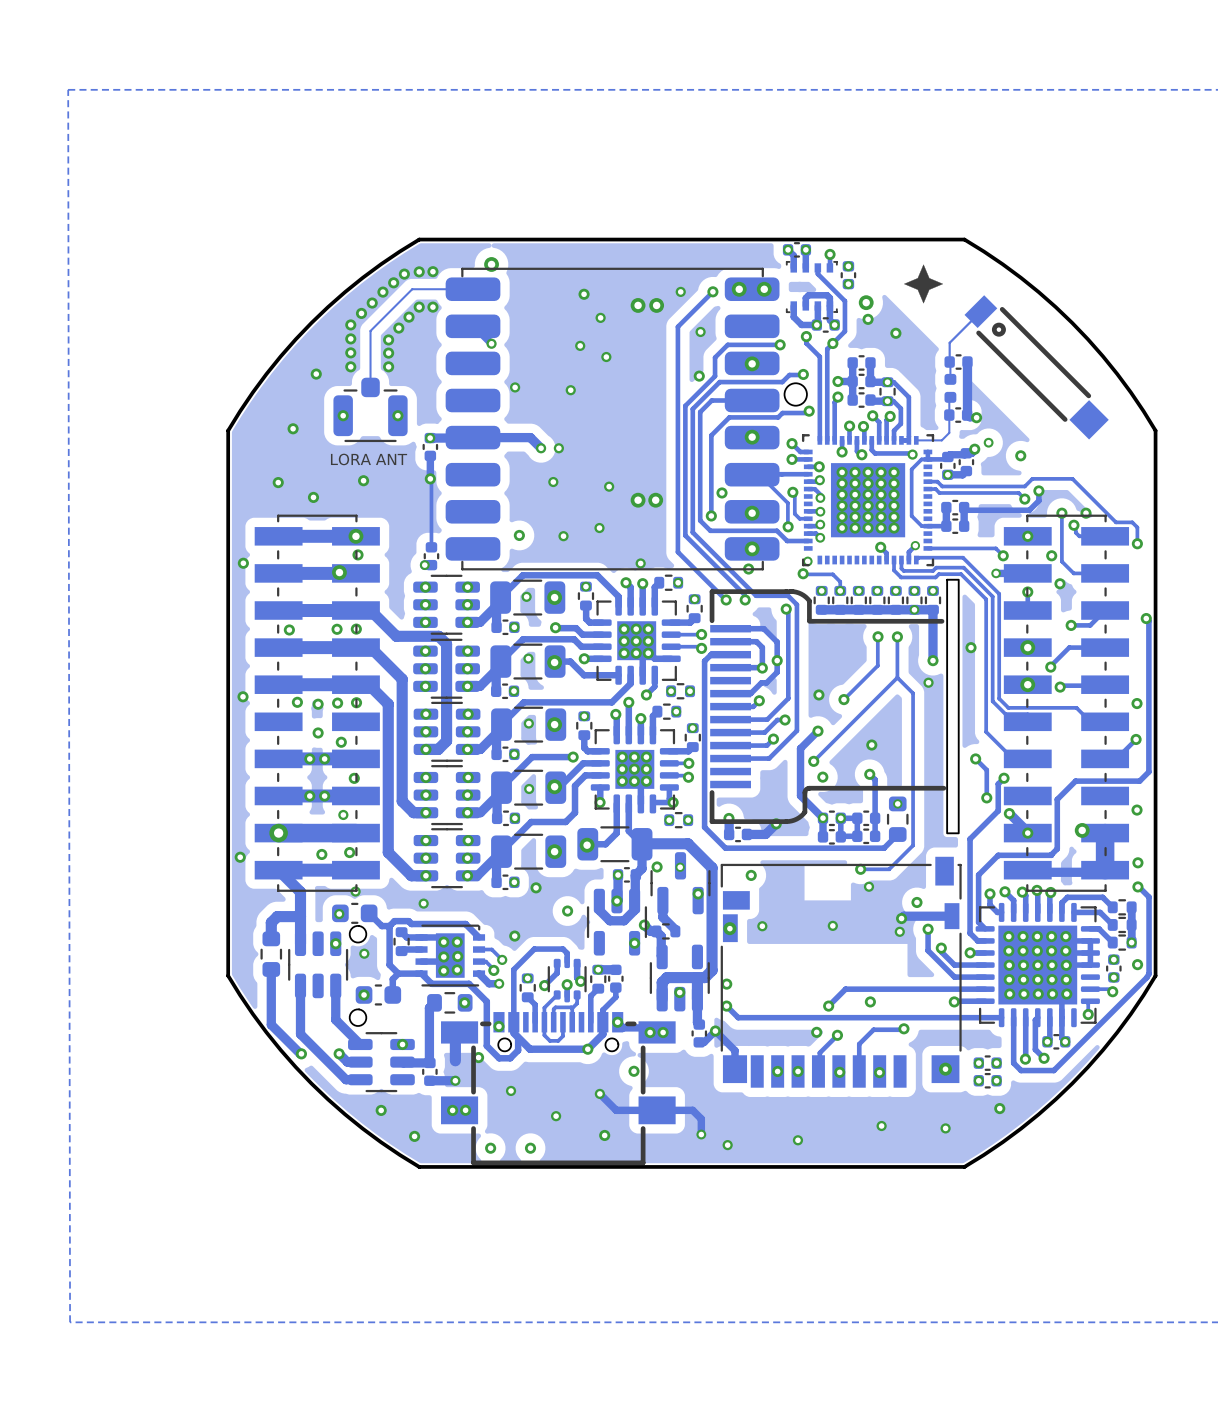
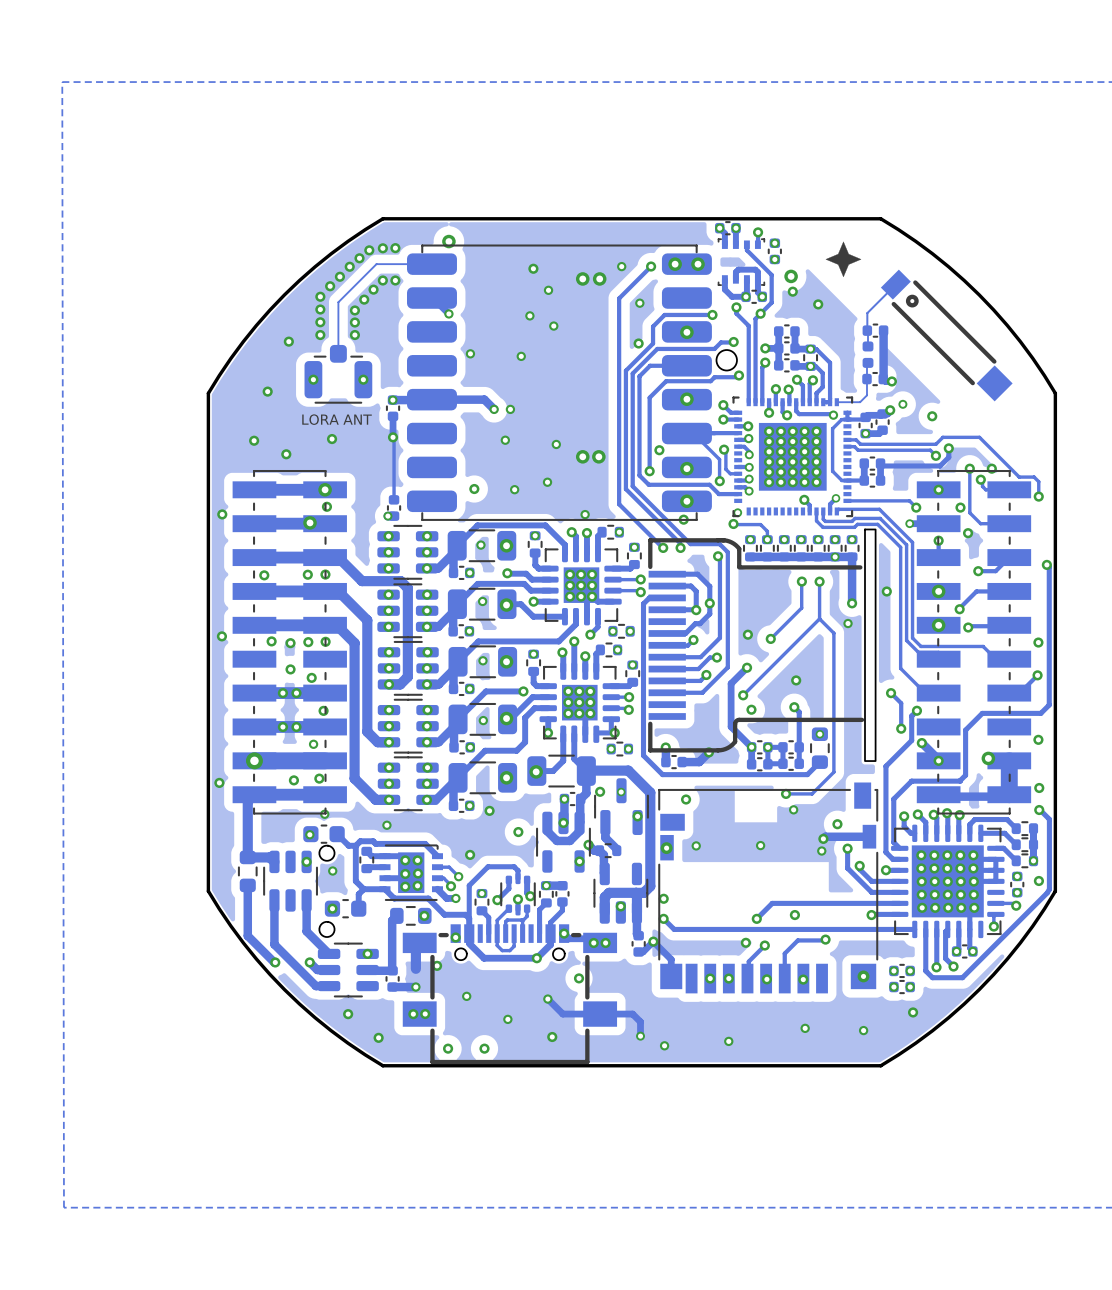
track: (278, 870) (300, 892) (300, 943) -> (254, 794) (247, 801) (247, 842)
track: (300, 916) (277, 916) (271, 922) -> none
track: none -> (247, 857) (270, 857) (274, 861)
track: (486, 1001) (486, 1045) (499, 1058) (510, 1058) (518, 1050) (518, 1037) -> (444, 914) (465, 914) (469, 918) (469, 933)

